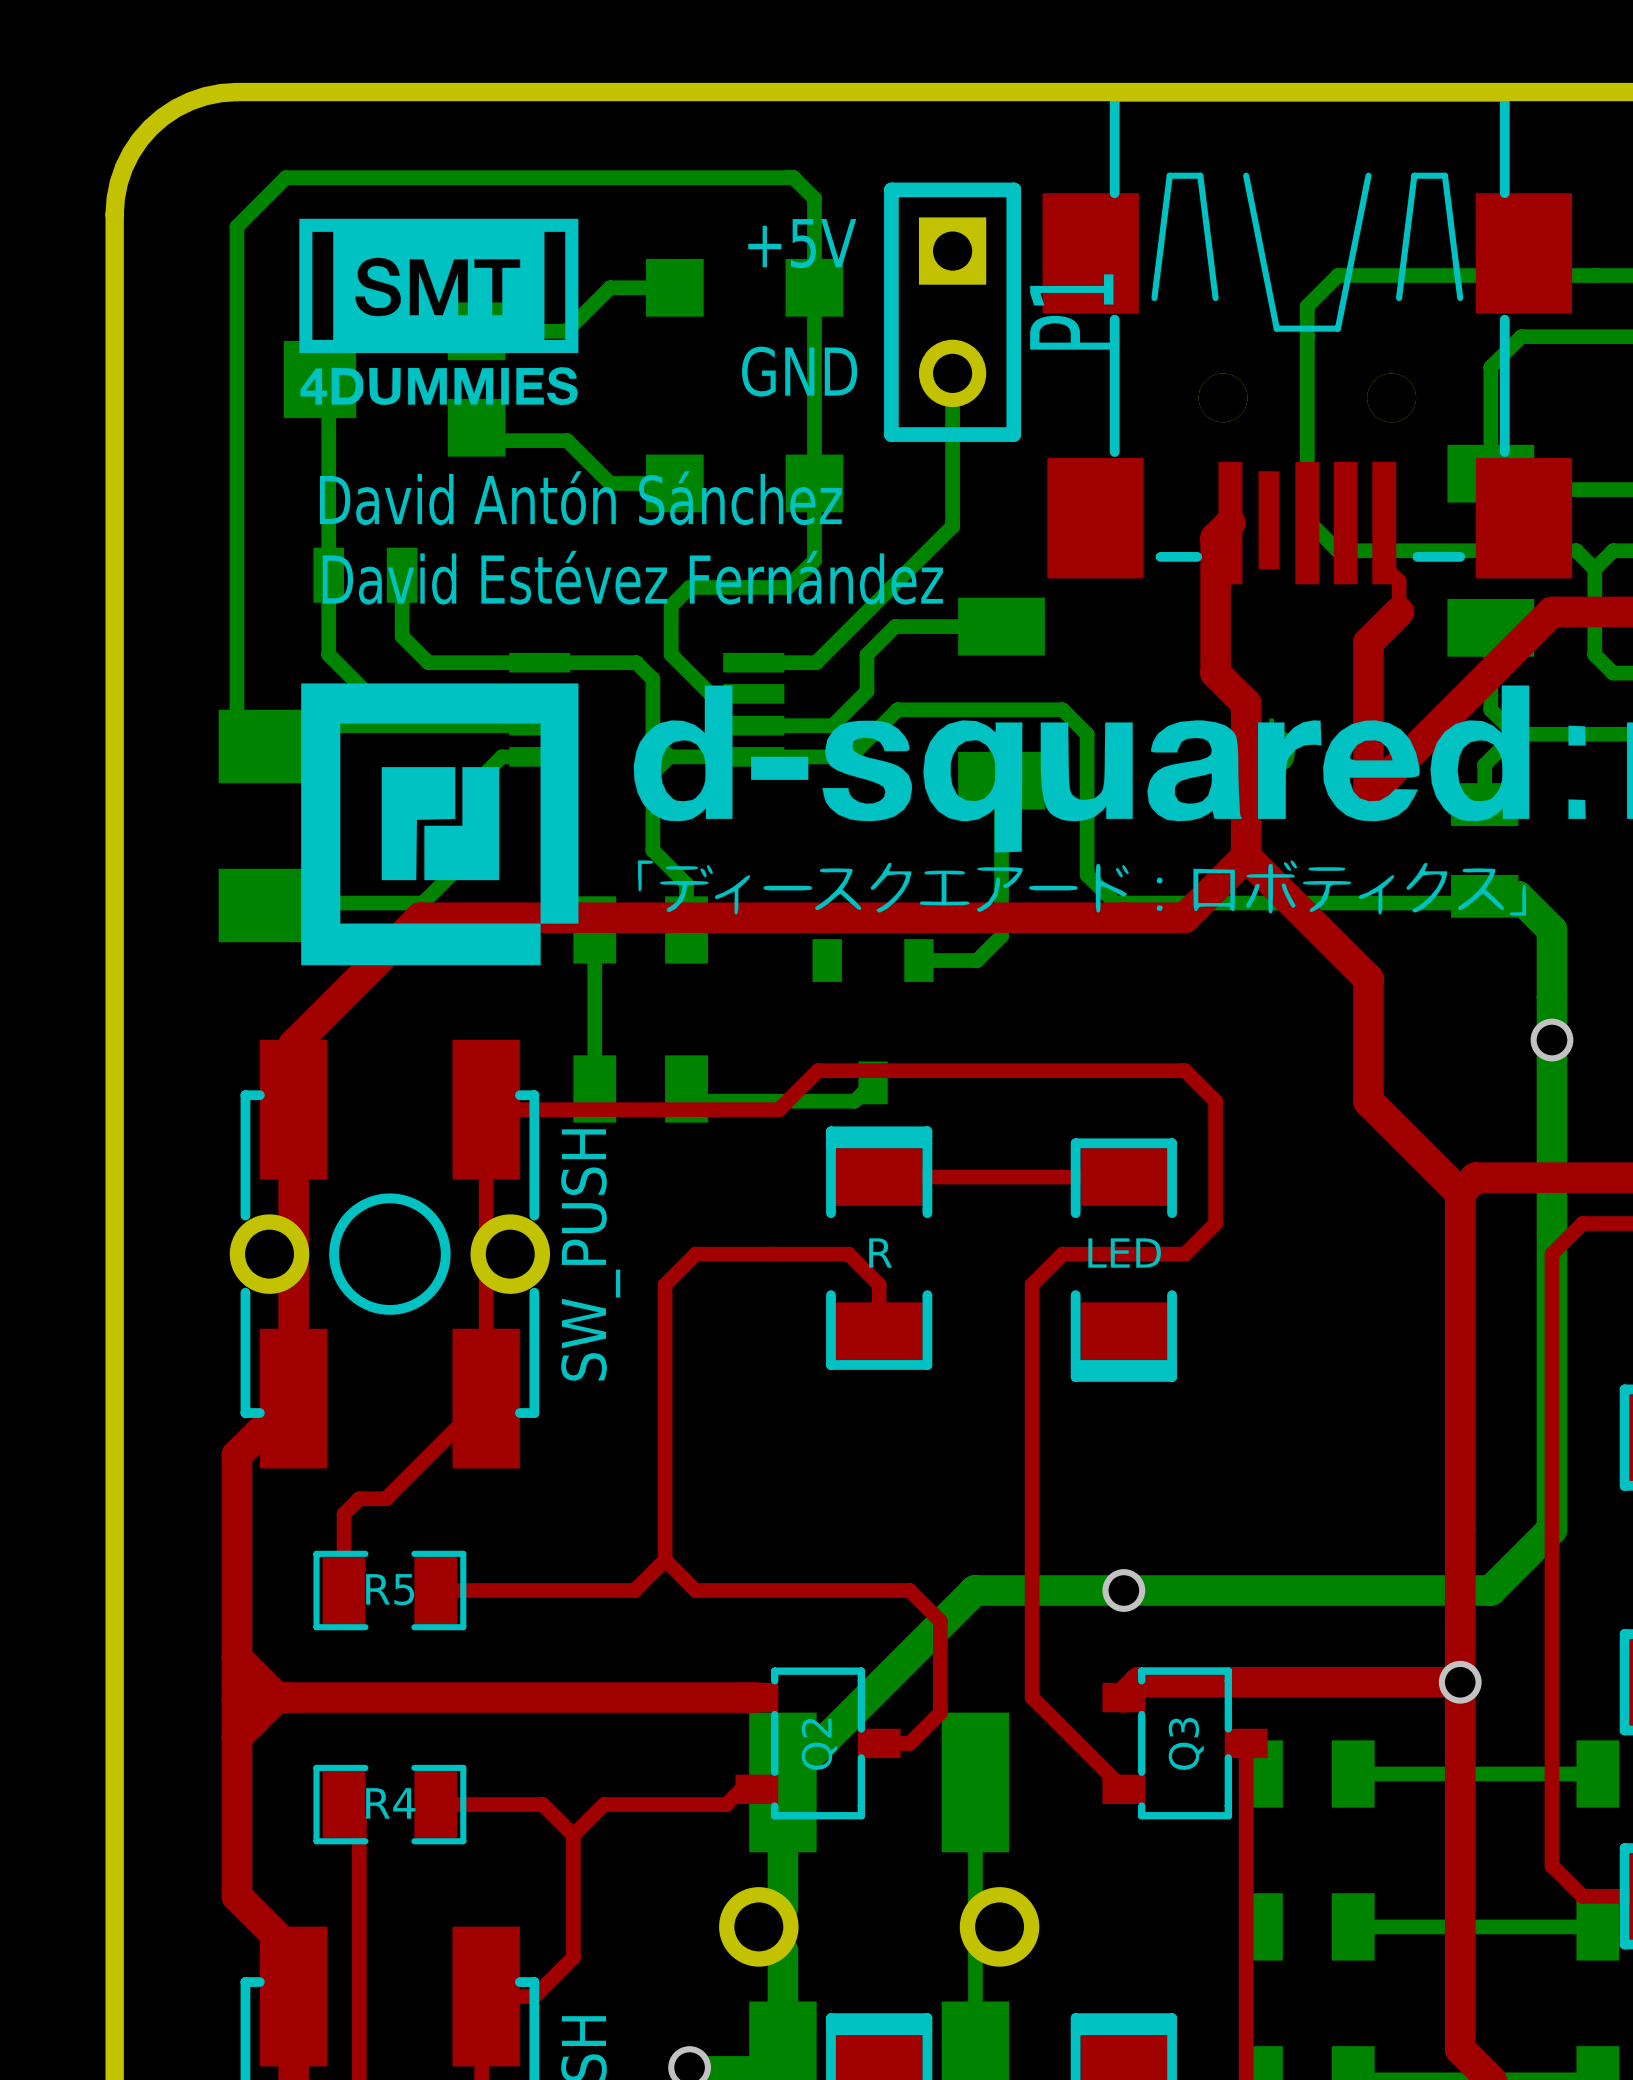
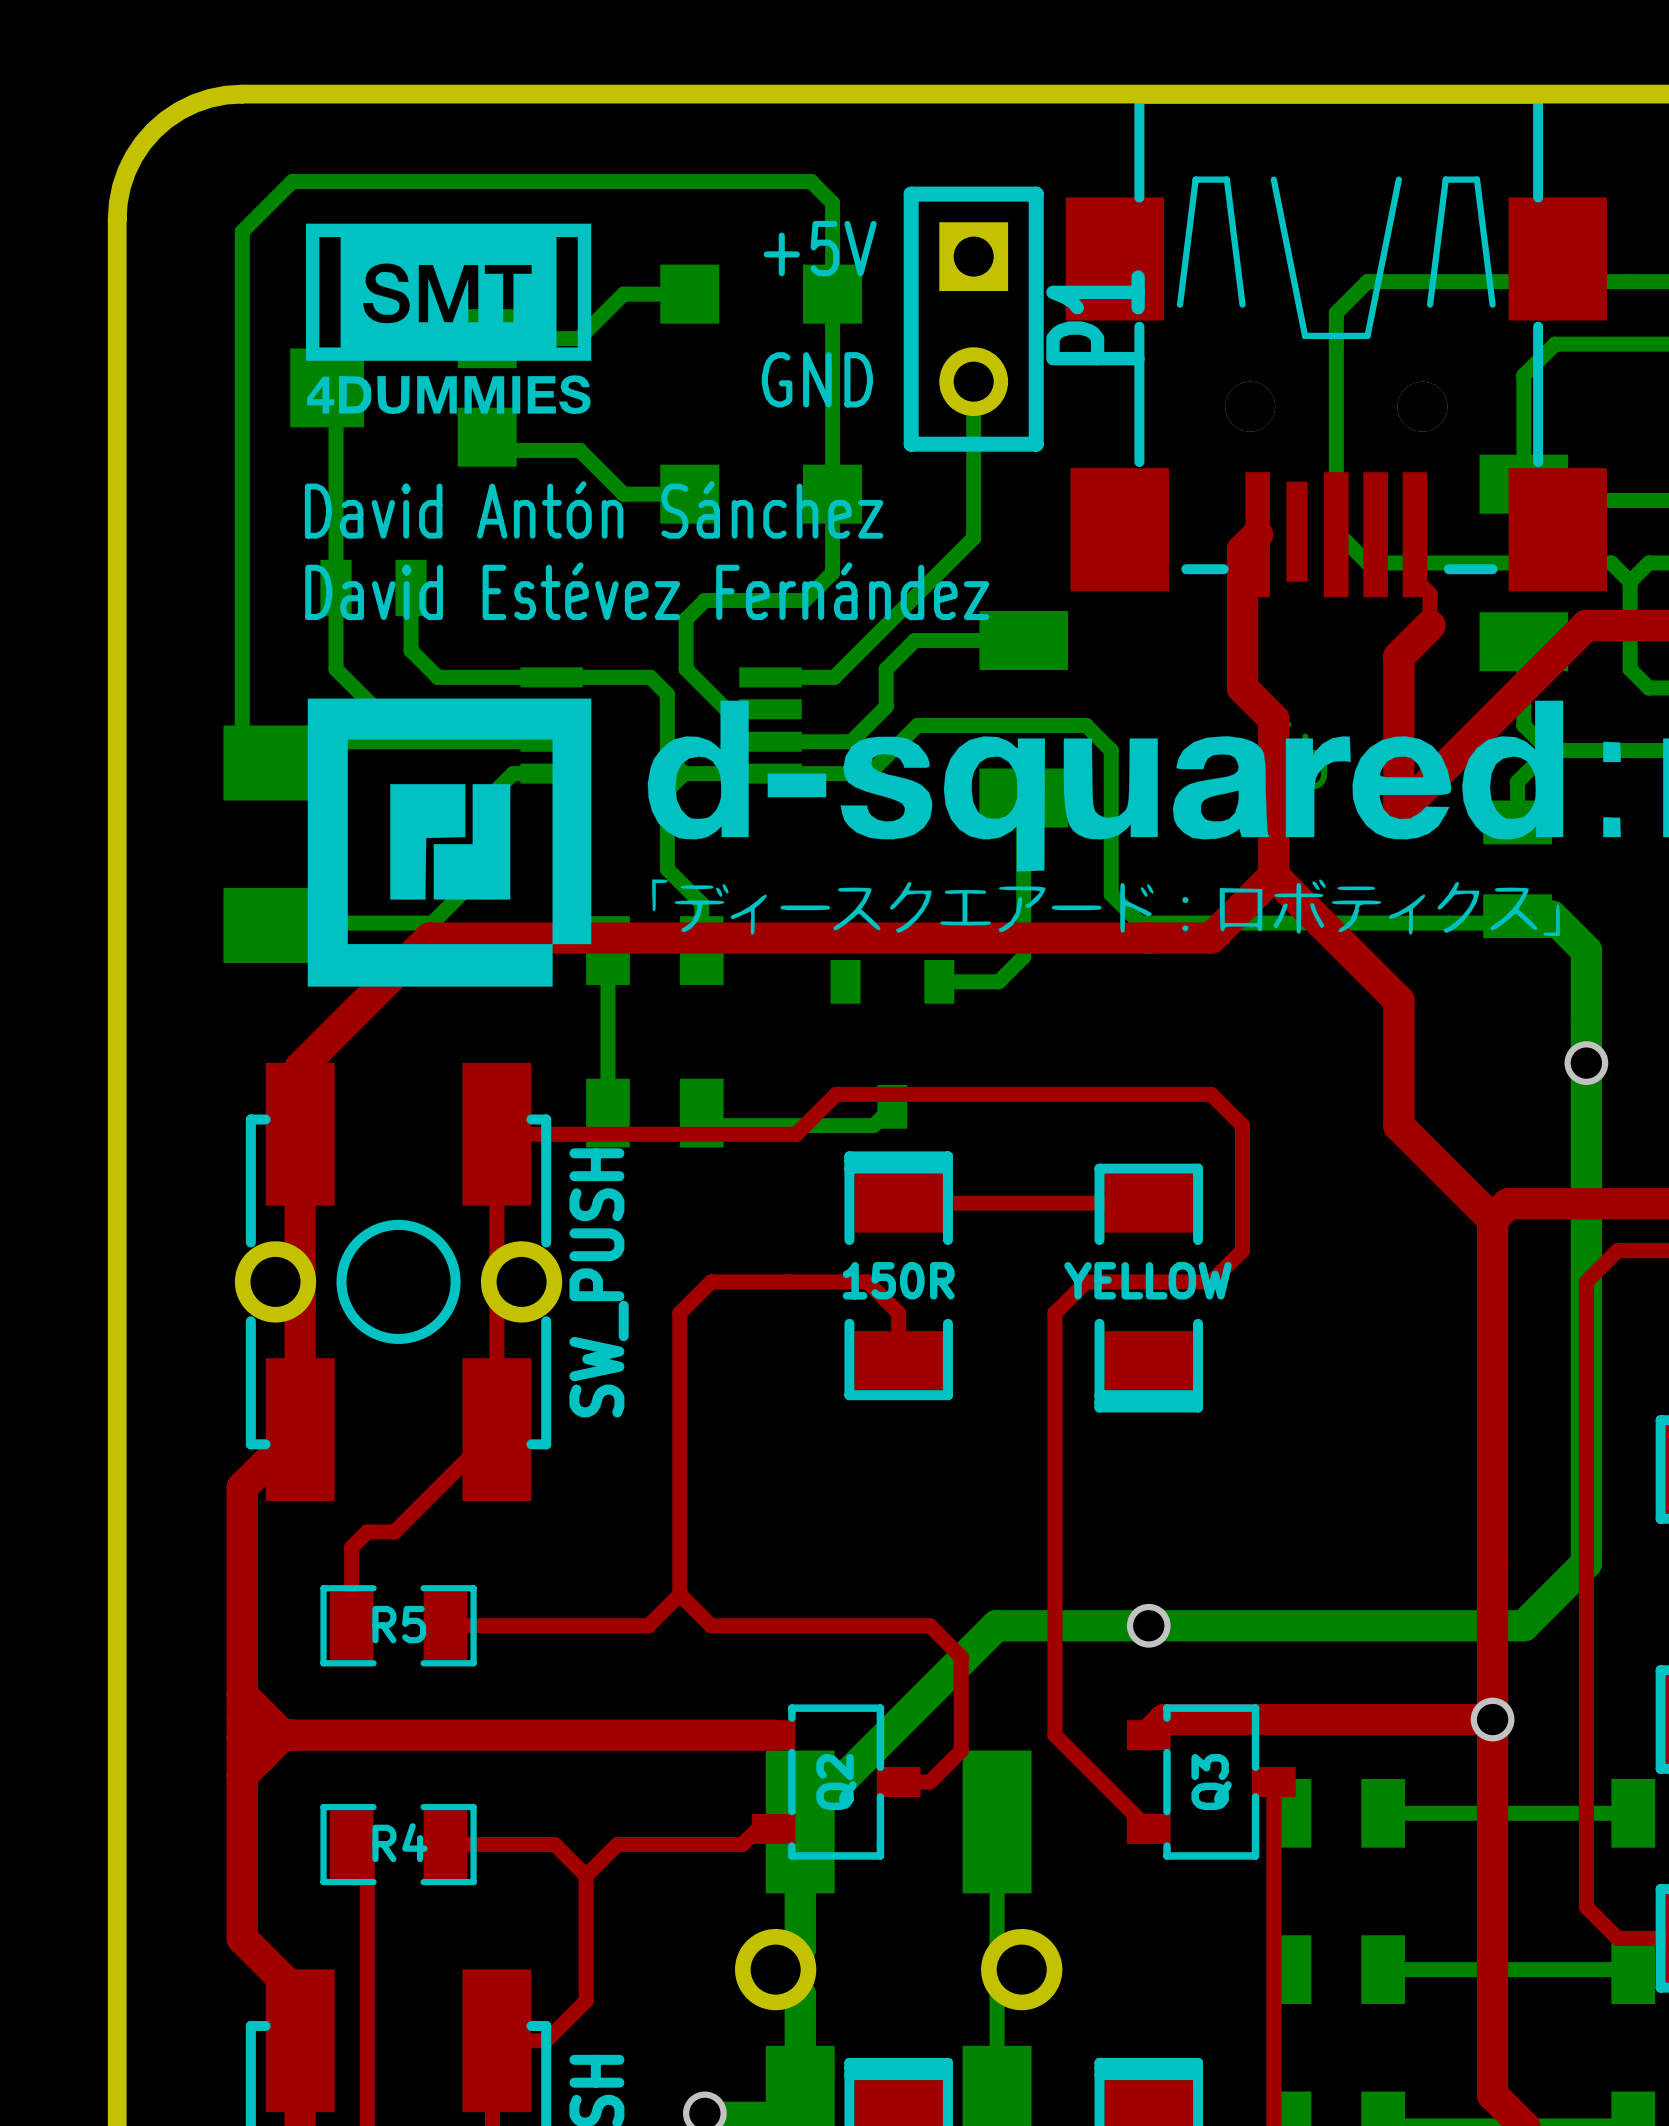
part value: R (880, 1253) -> 150R (898, 1280)
part value: LED (1124, 1253) -> YELLOW (1148, 1280)

